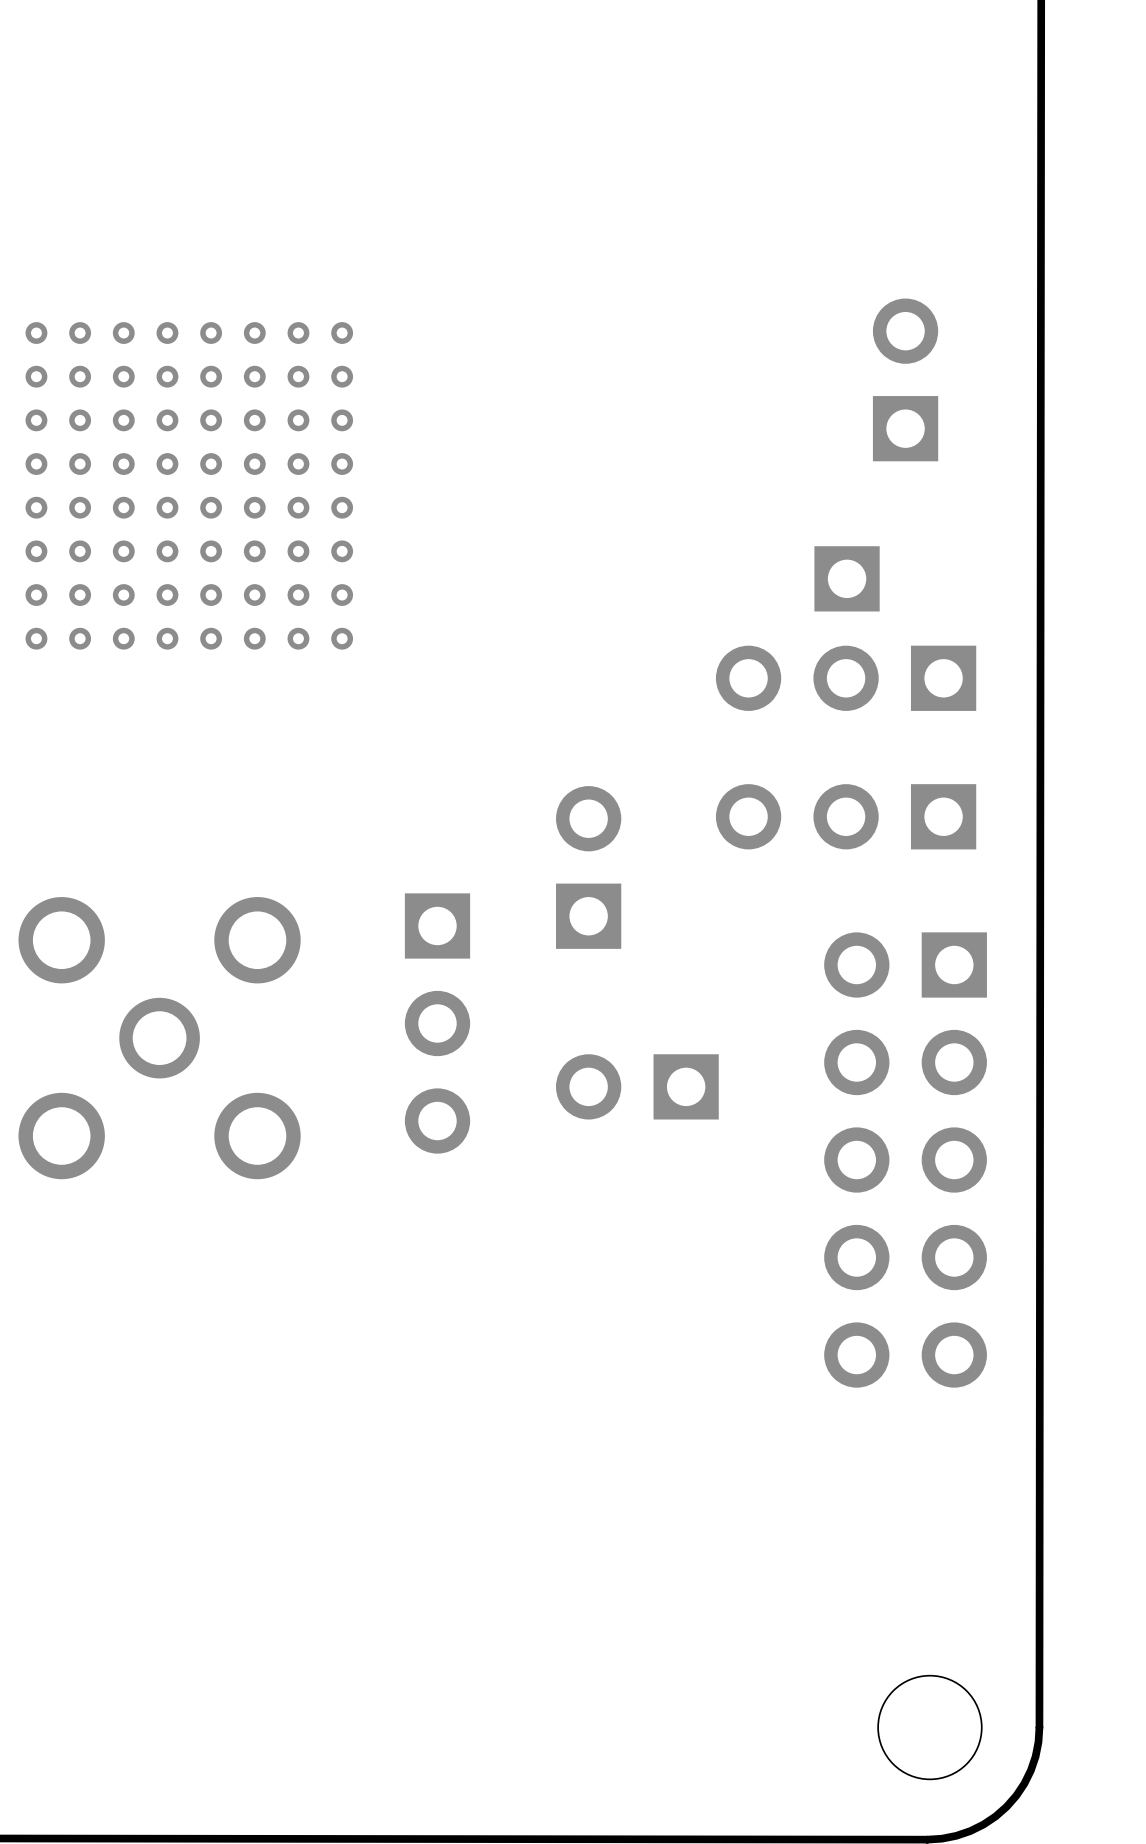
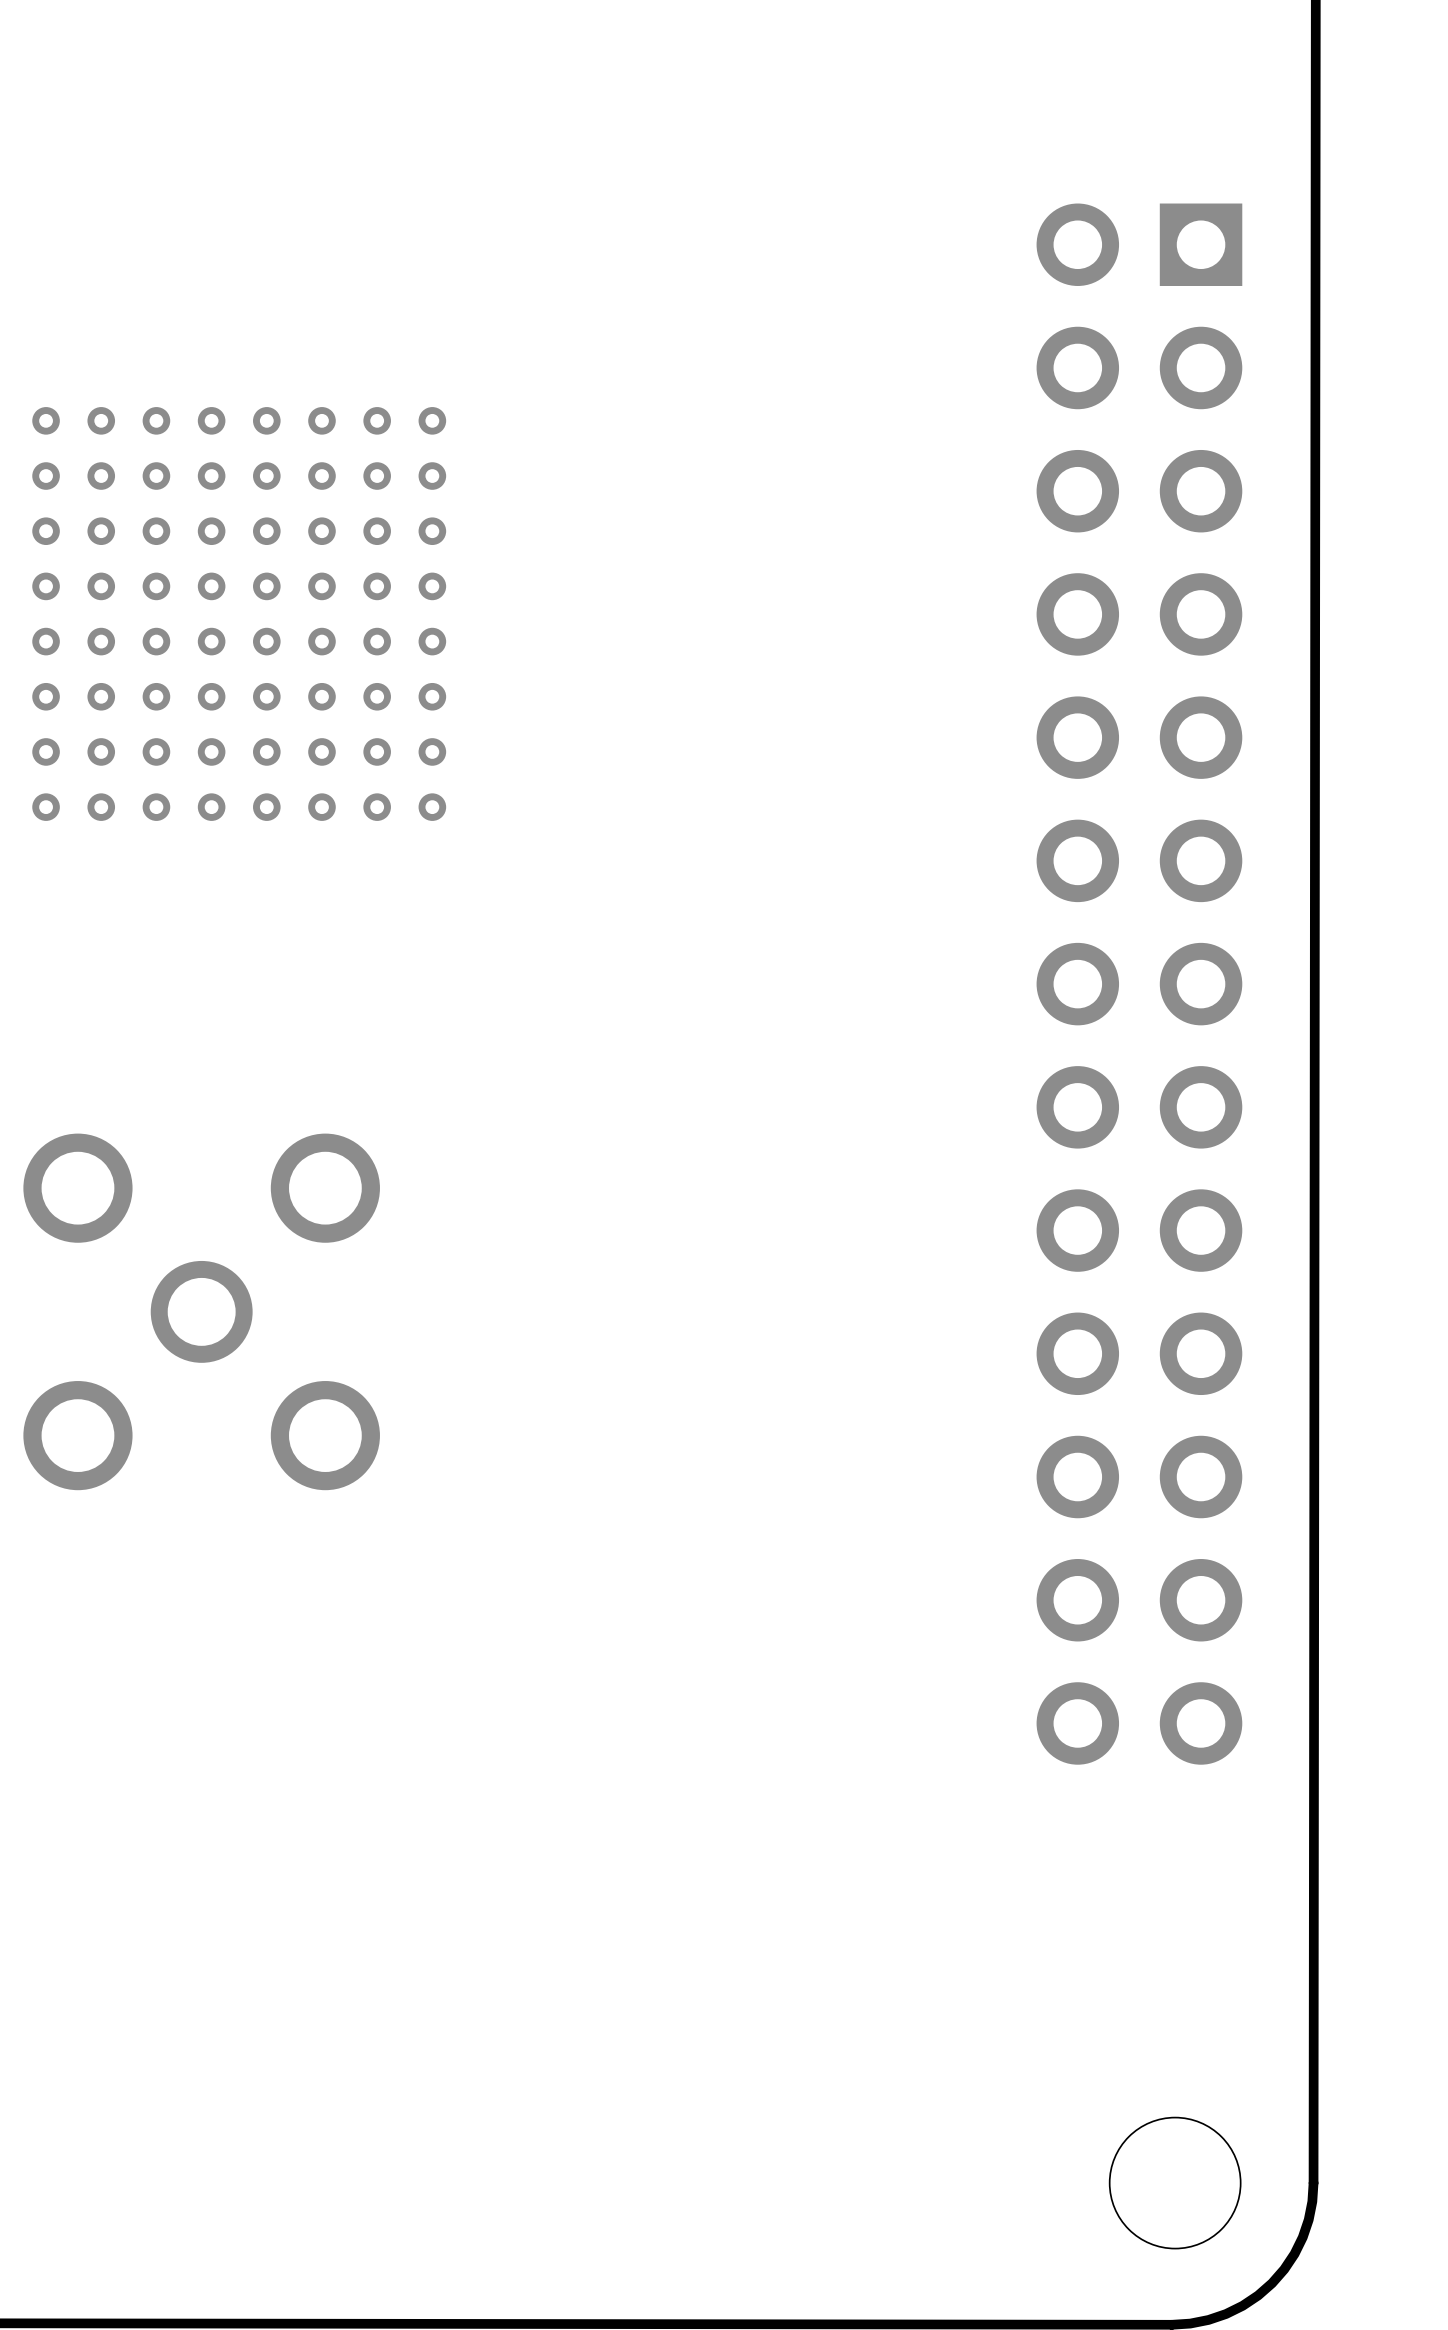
part: (905, 379) -> none
part: (847, 578) -> none
part: (846, 678) -> none
part: none -> (1139, 984)
part: (846, 816) -> none
part: (588, 867) -> none
part: (437, 1023) -> none
part: (637, 1086) -> none
part: (905, 1160) -> none

